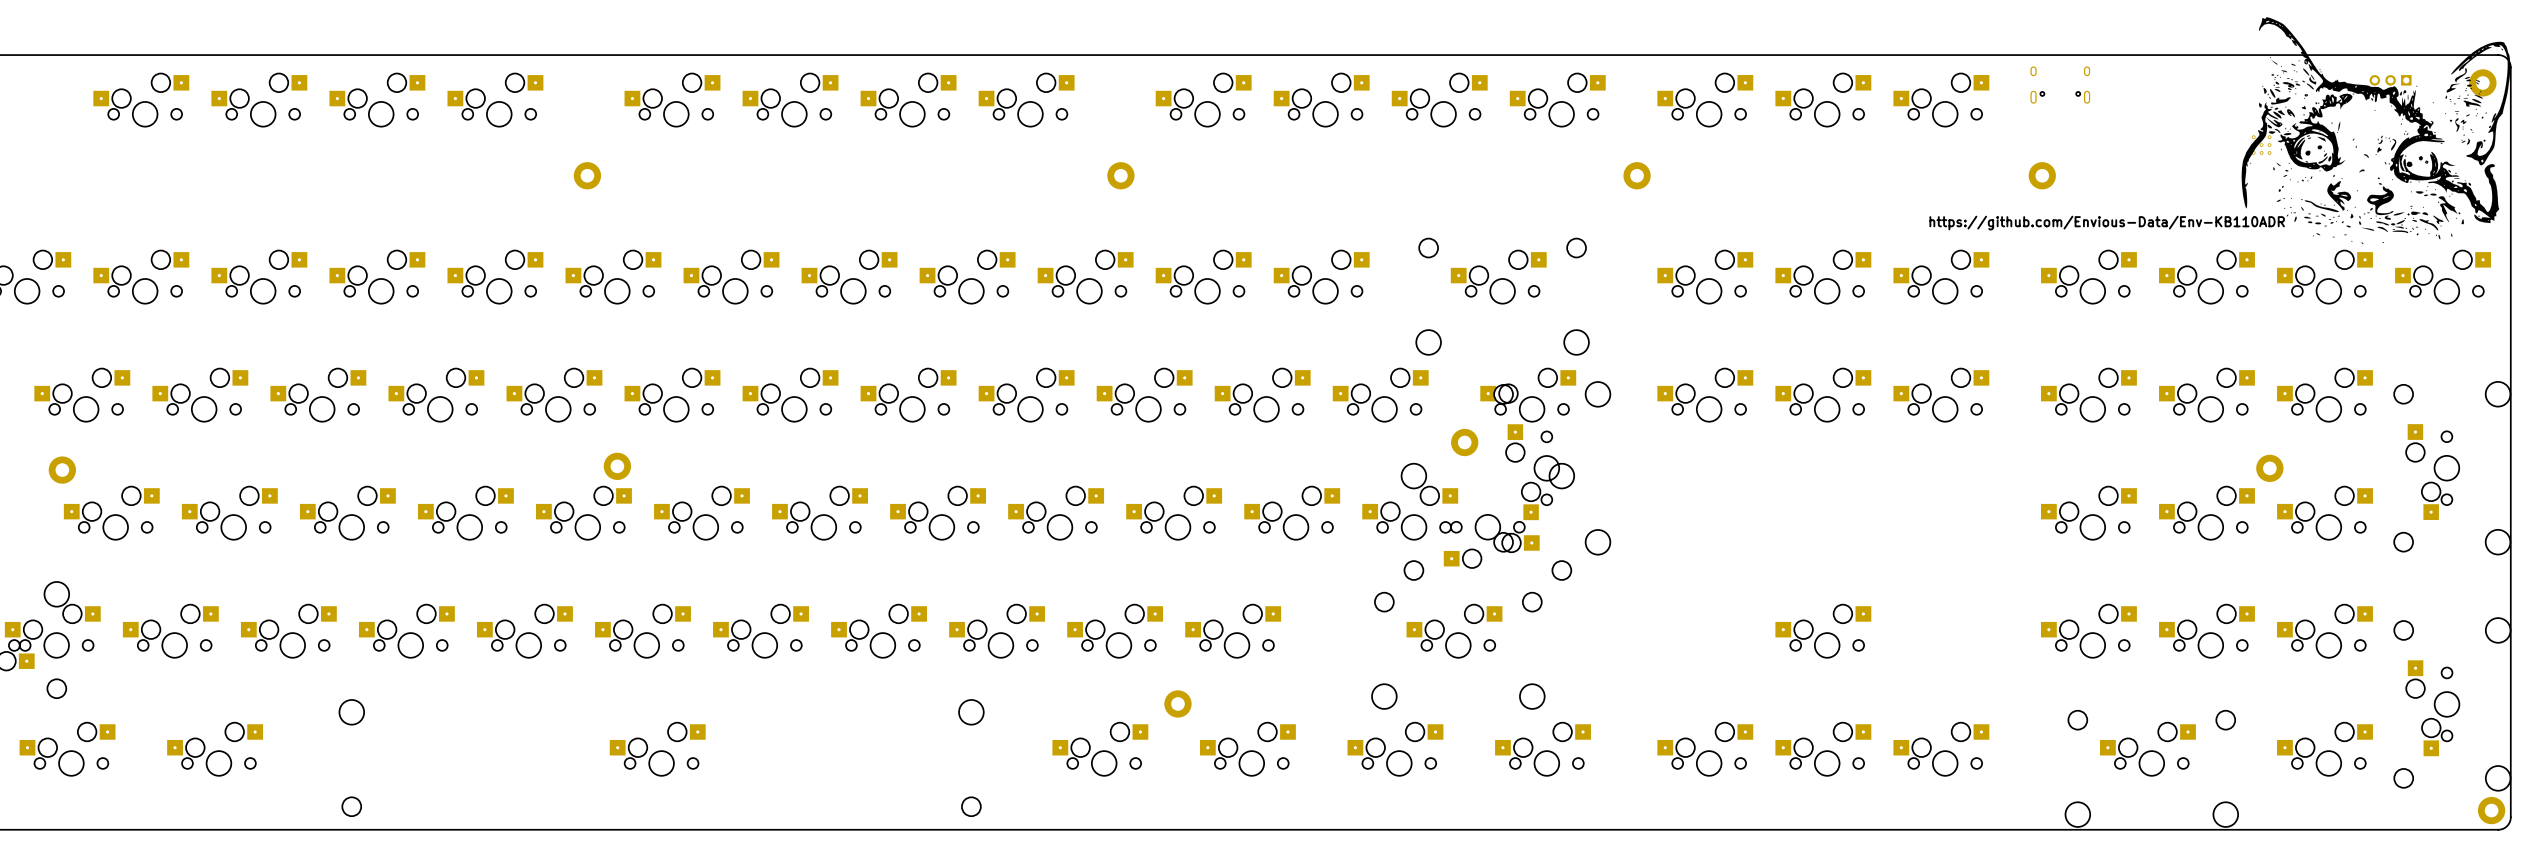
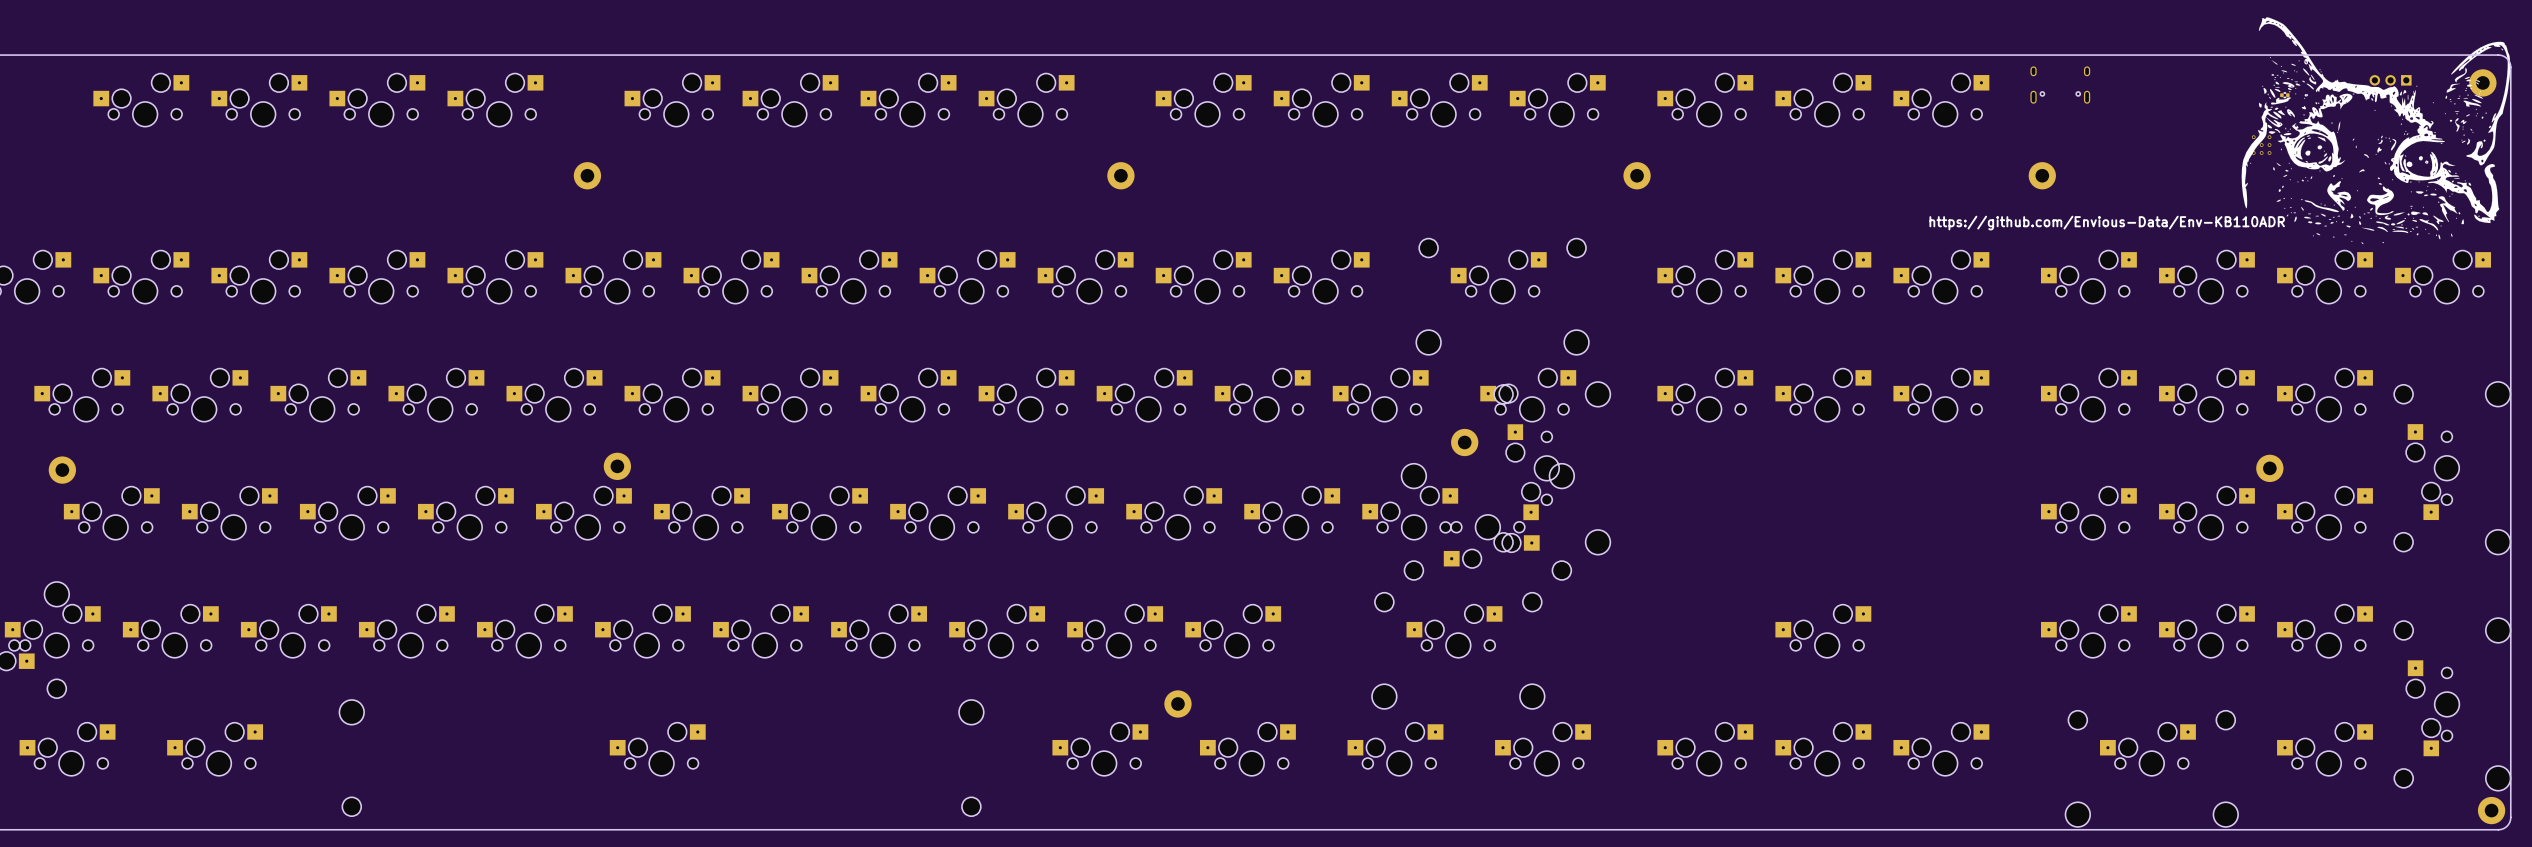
part: none -> (2284, 95)

